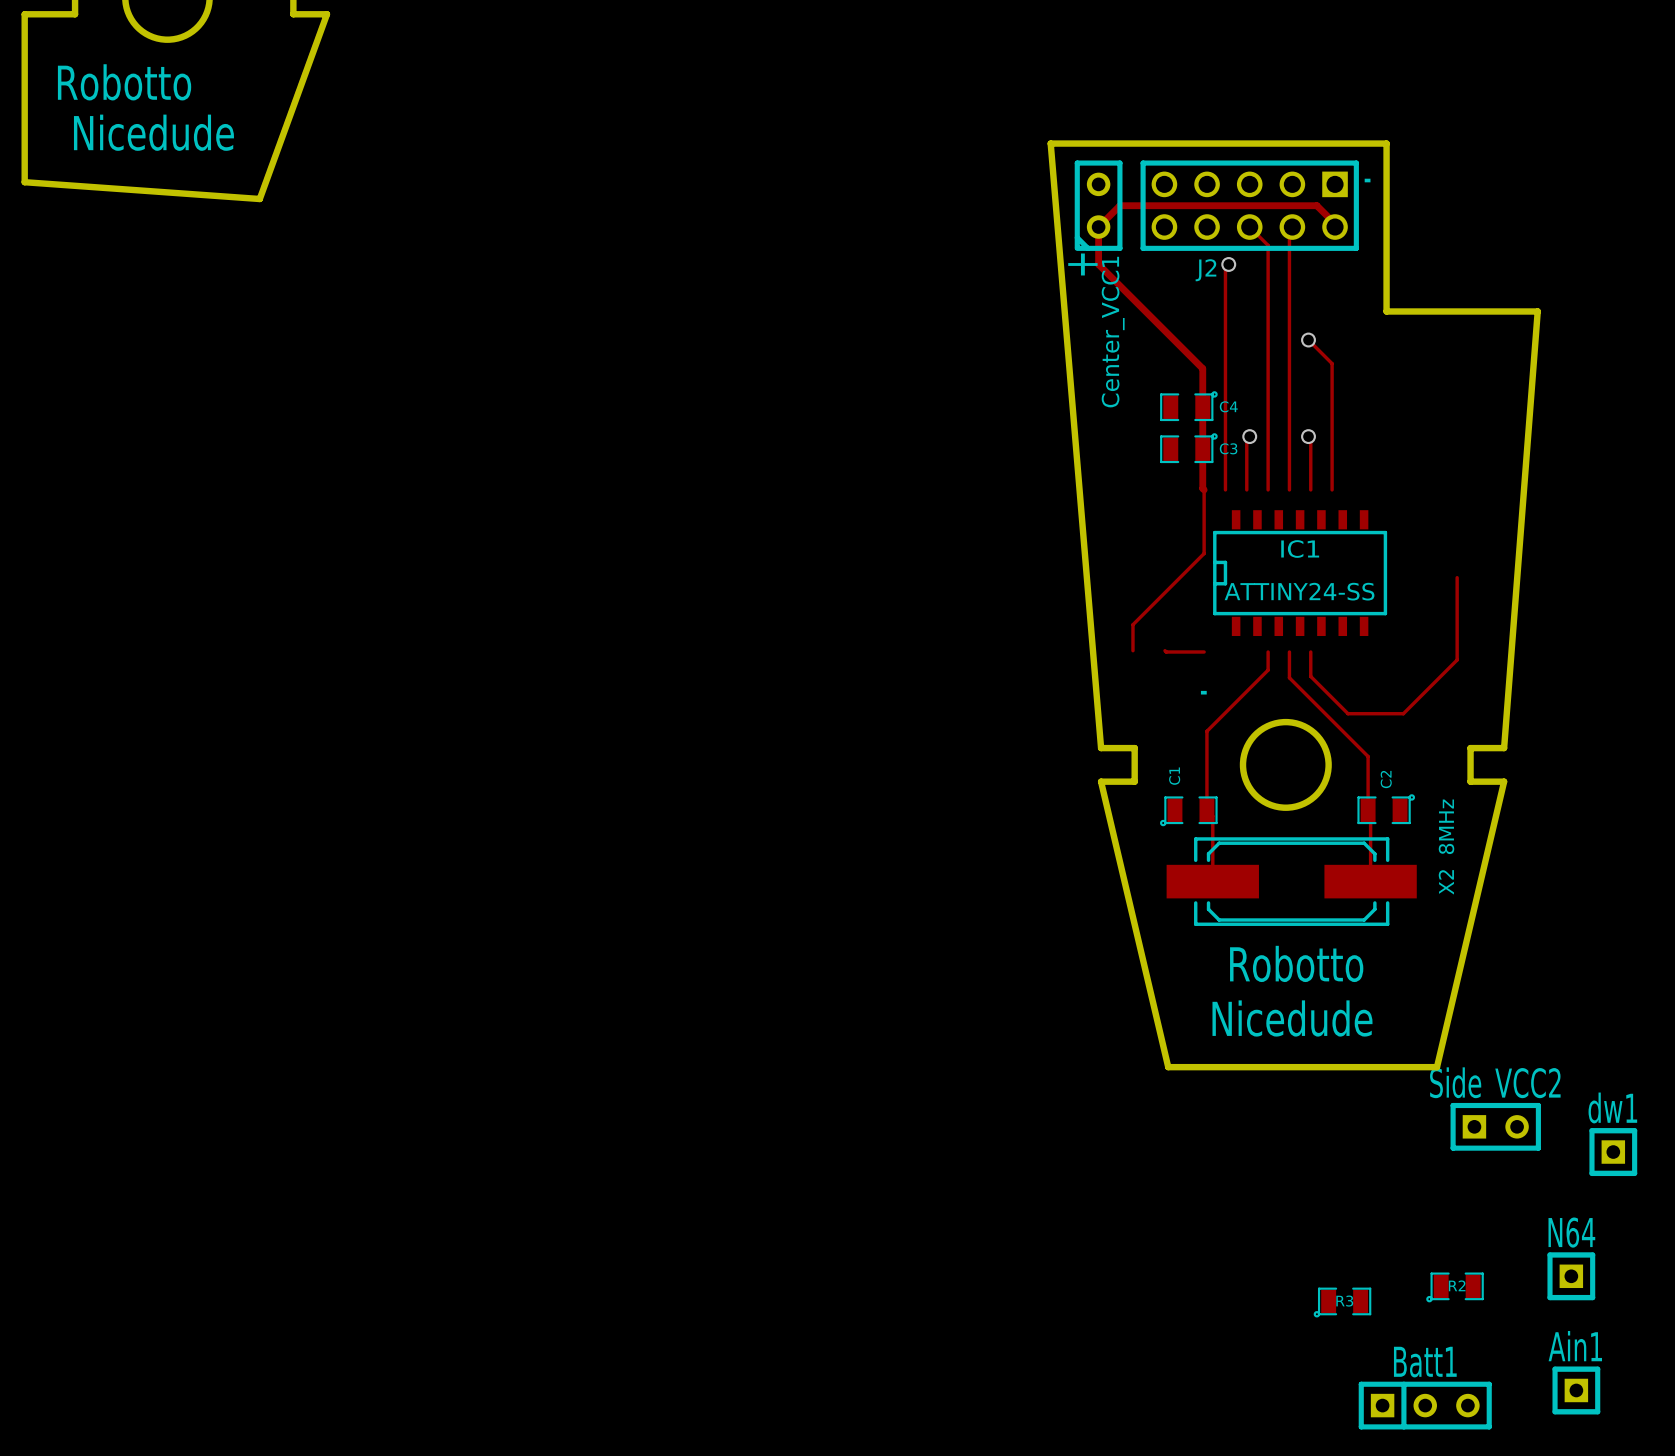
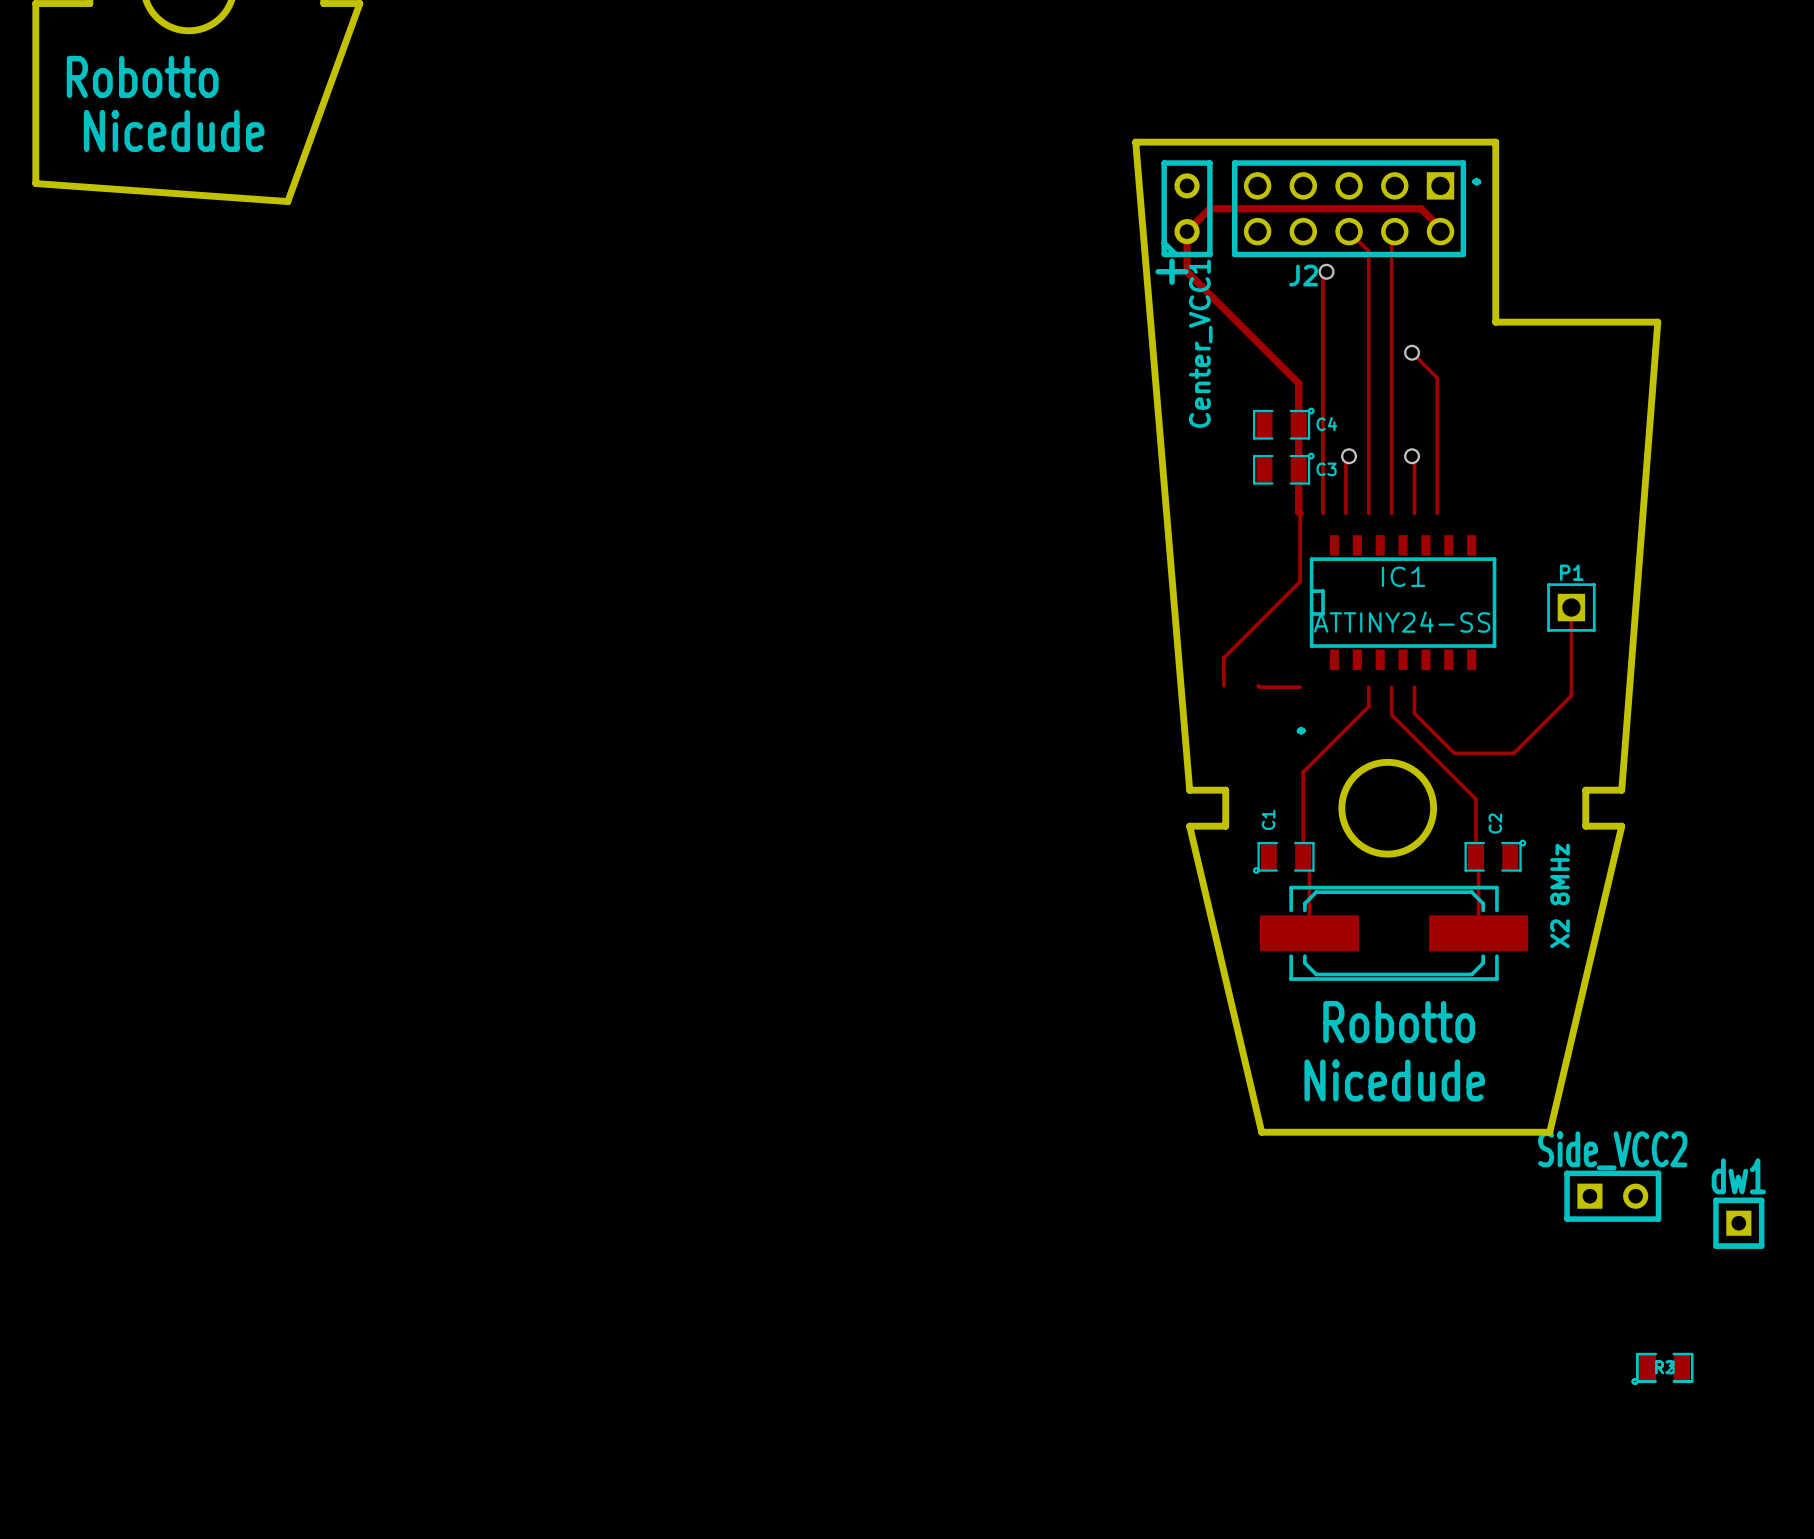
P1: none -> (1571, 607)
N64: (1571, 1276) -> none
R2 position: (1455, 1287) -> (1662, 1368)
R3 position: (1342, 1302) -> (1662, 1368)
Ain1: (1576, 1390) -> none
Batt1: (1425, 1405) -> none

